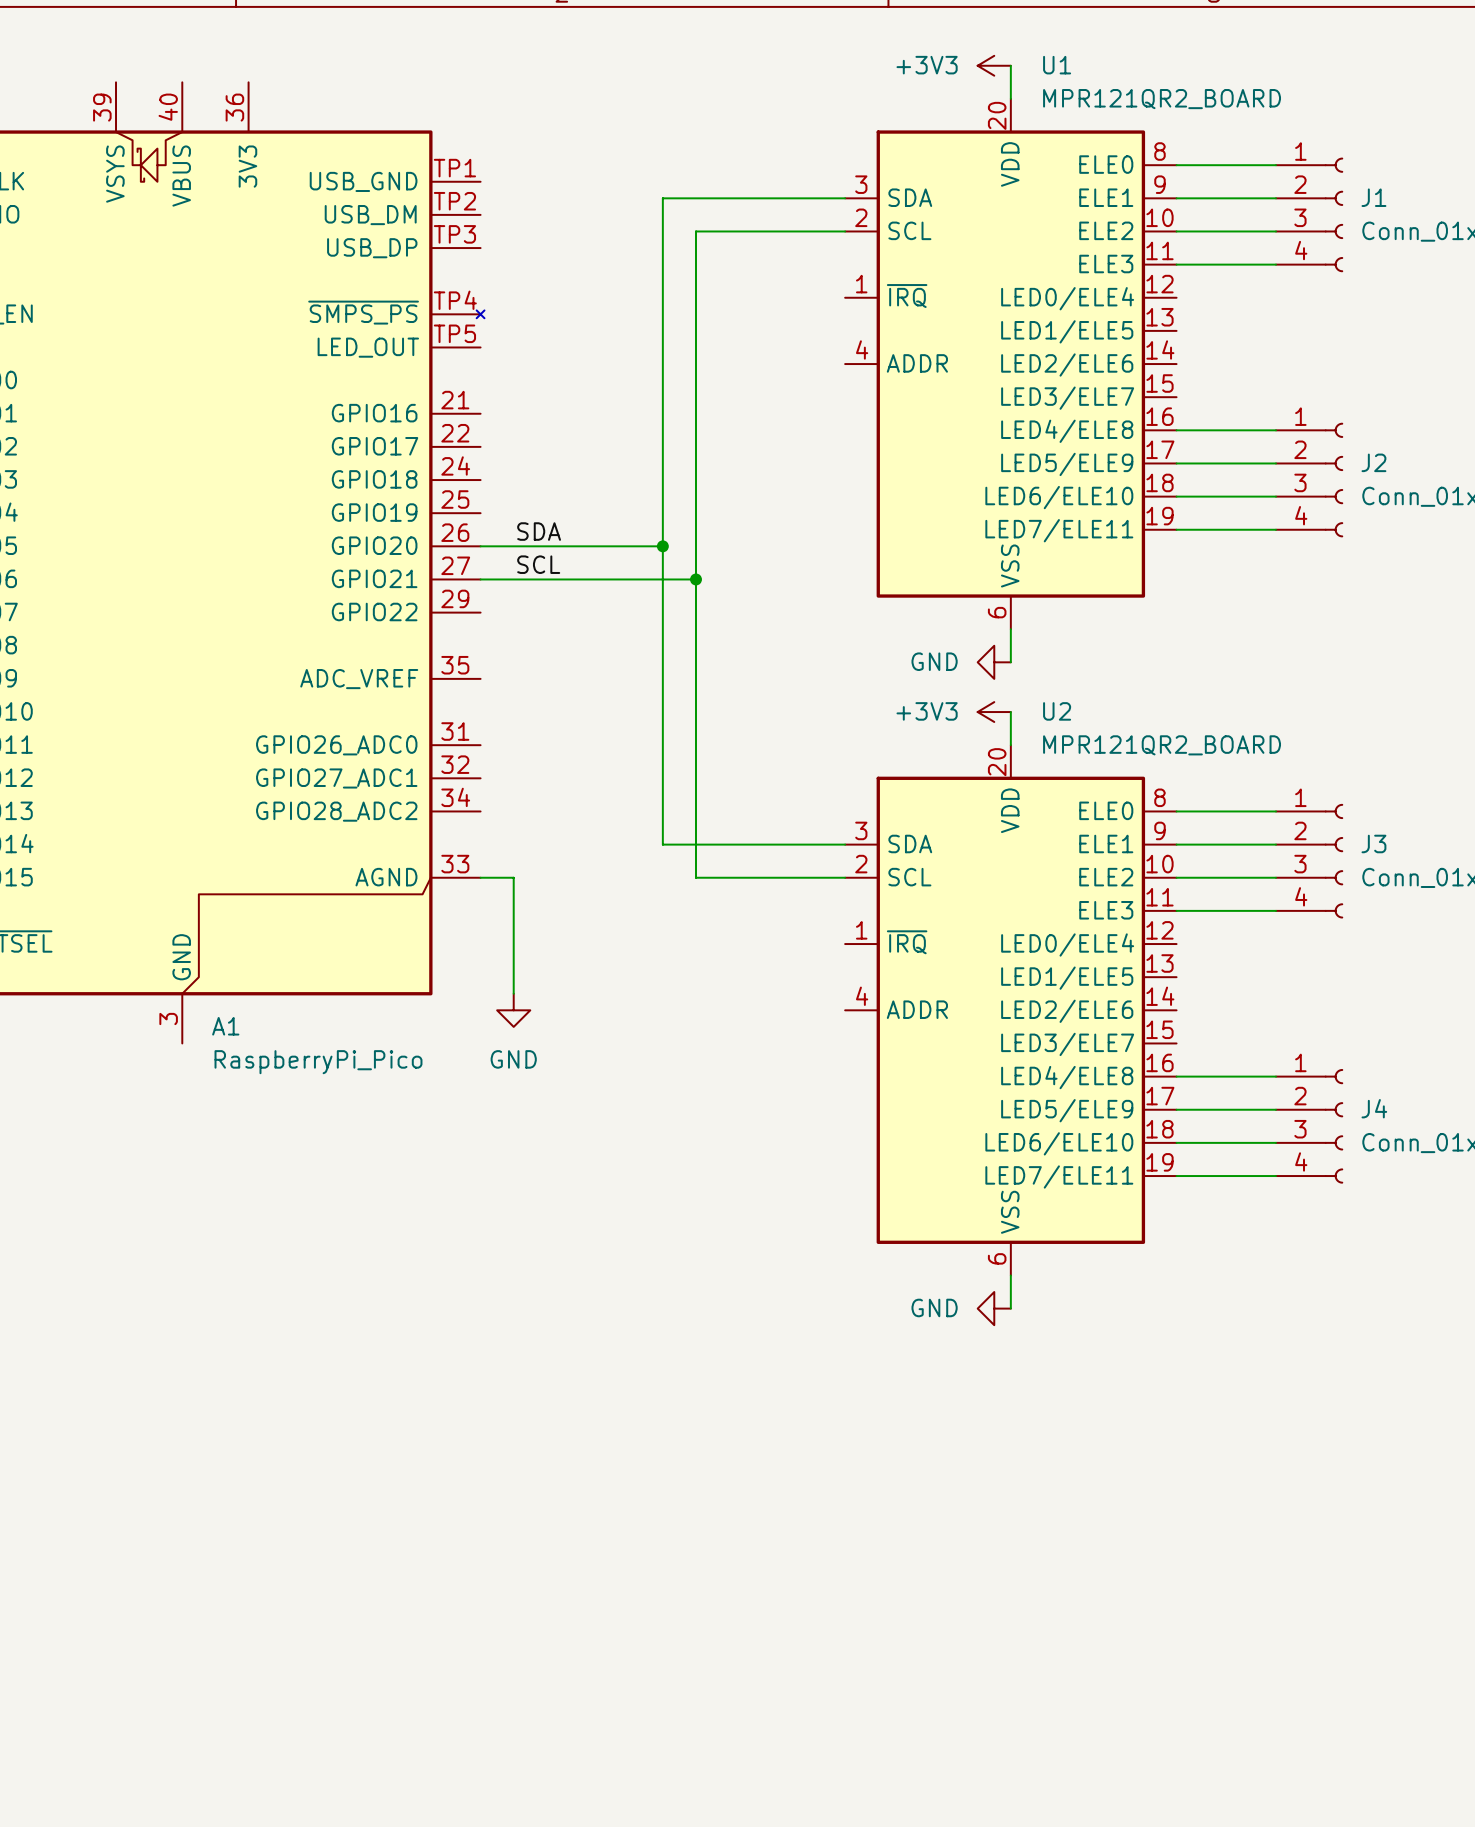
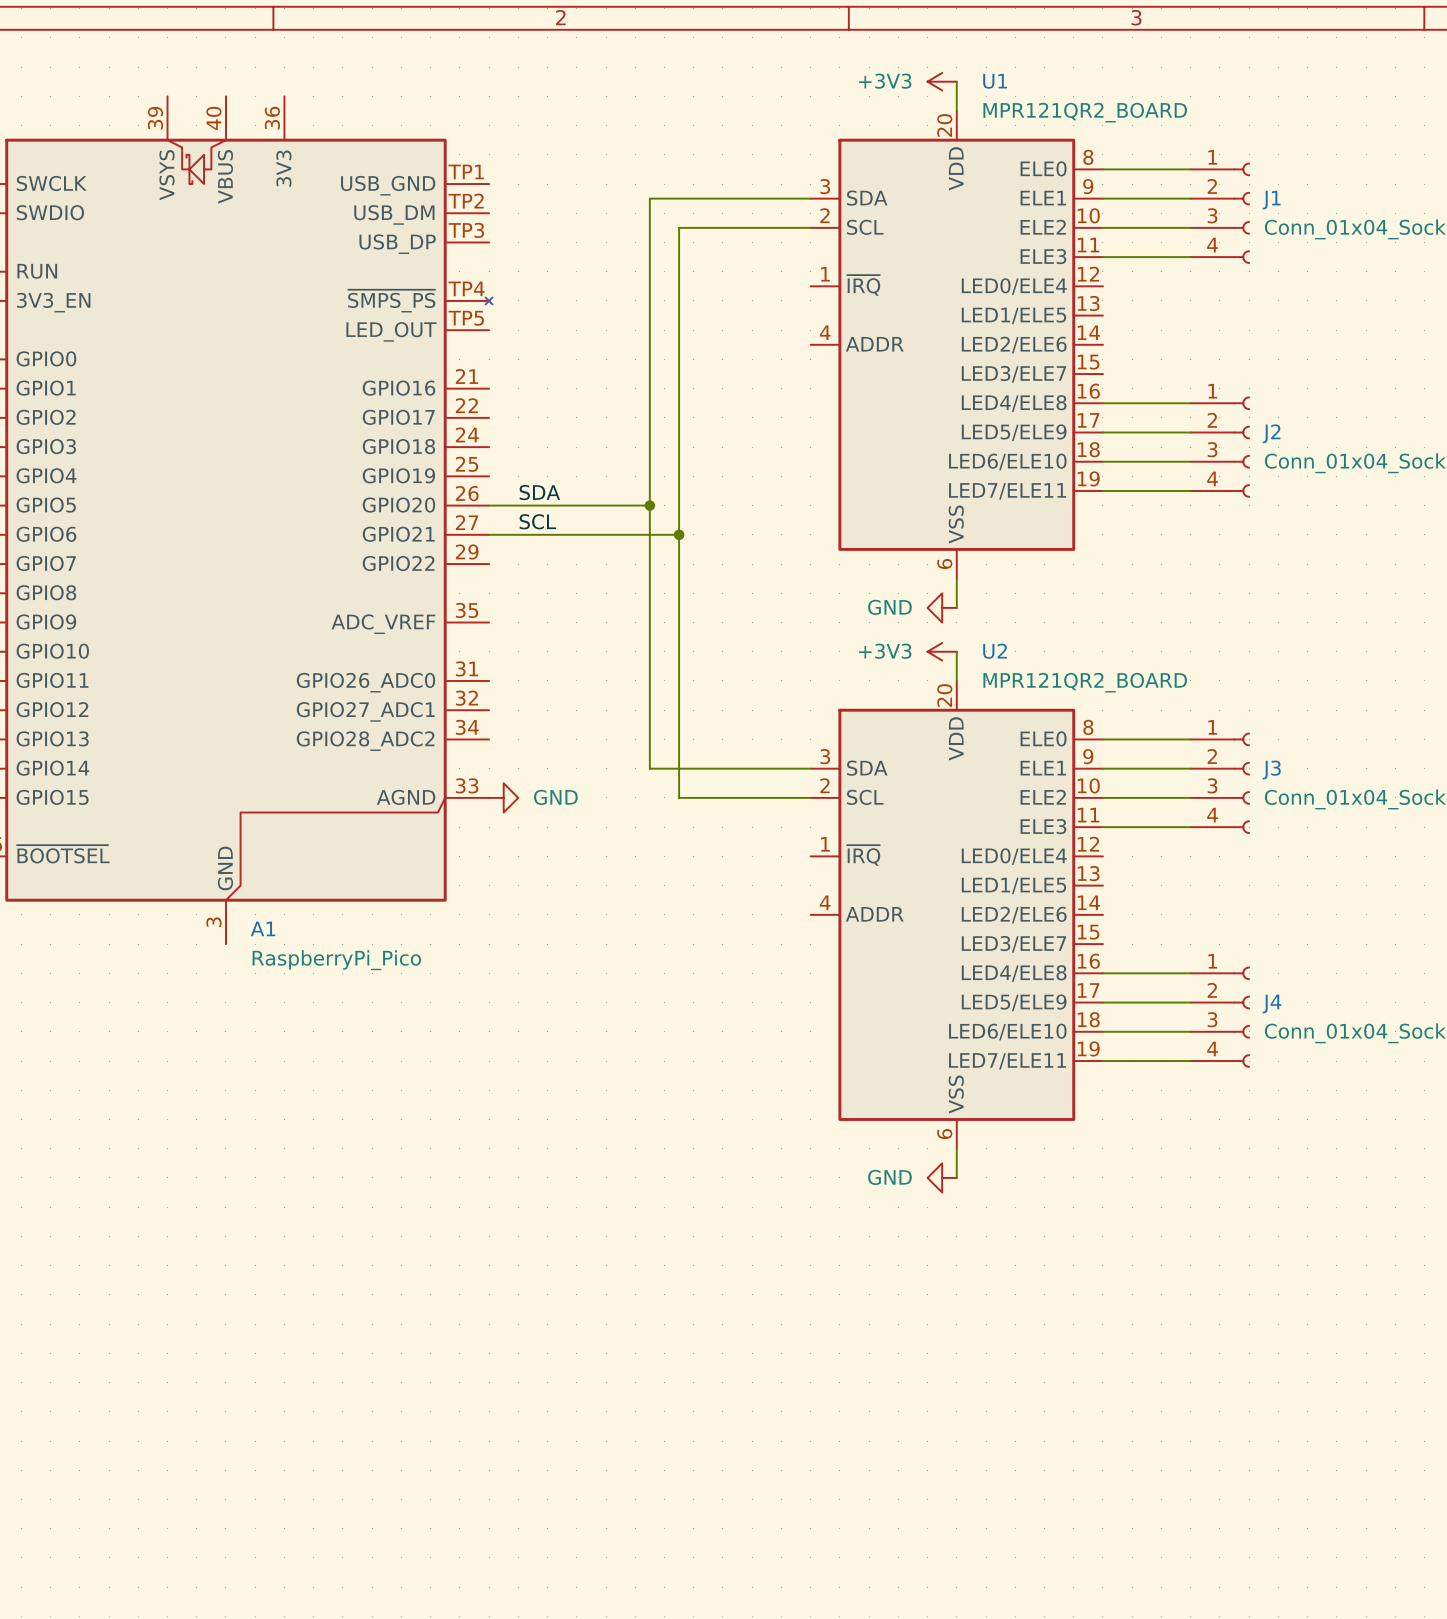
wire: (480, 877) (513, 877) (513, 993) -> none
power symbol rotation: 0° (513, 1010) -> 90° counterclockwise (503, 797)
power symbol position: GND (513, 1010) -> GND (503, 797)

